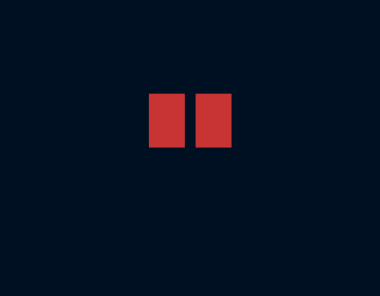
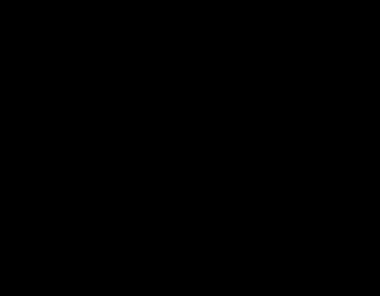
part: (190, 120) -> none

